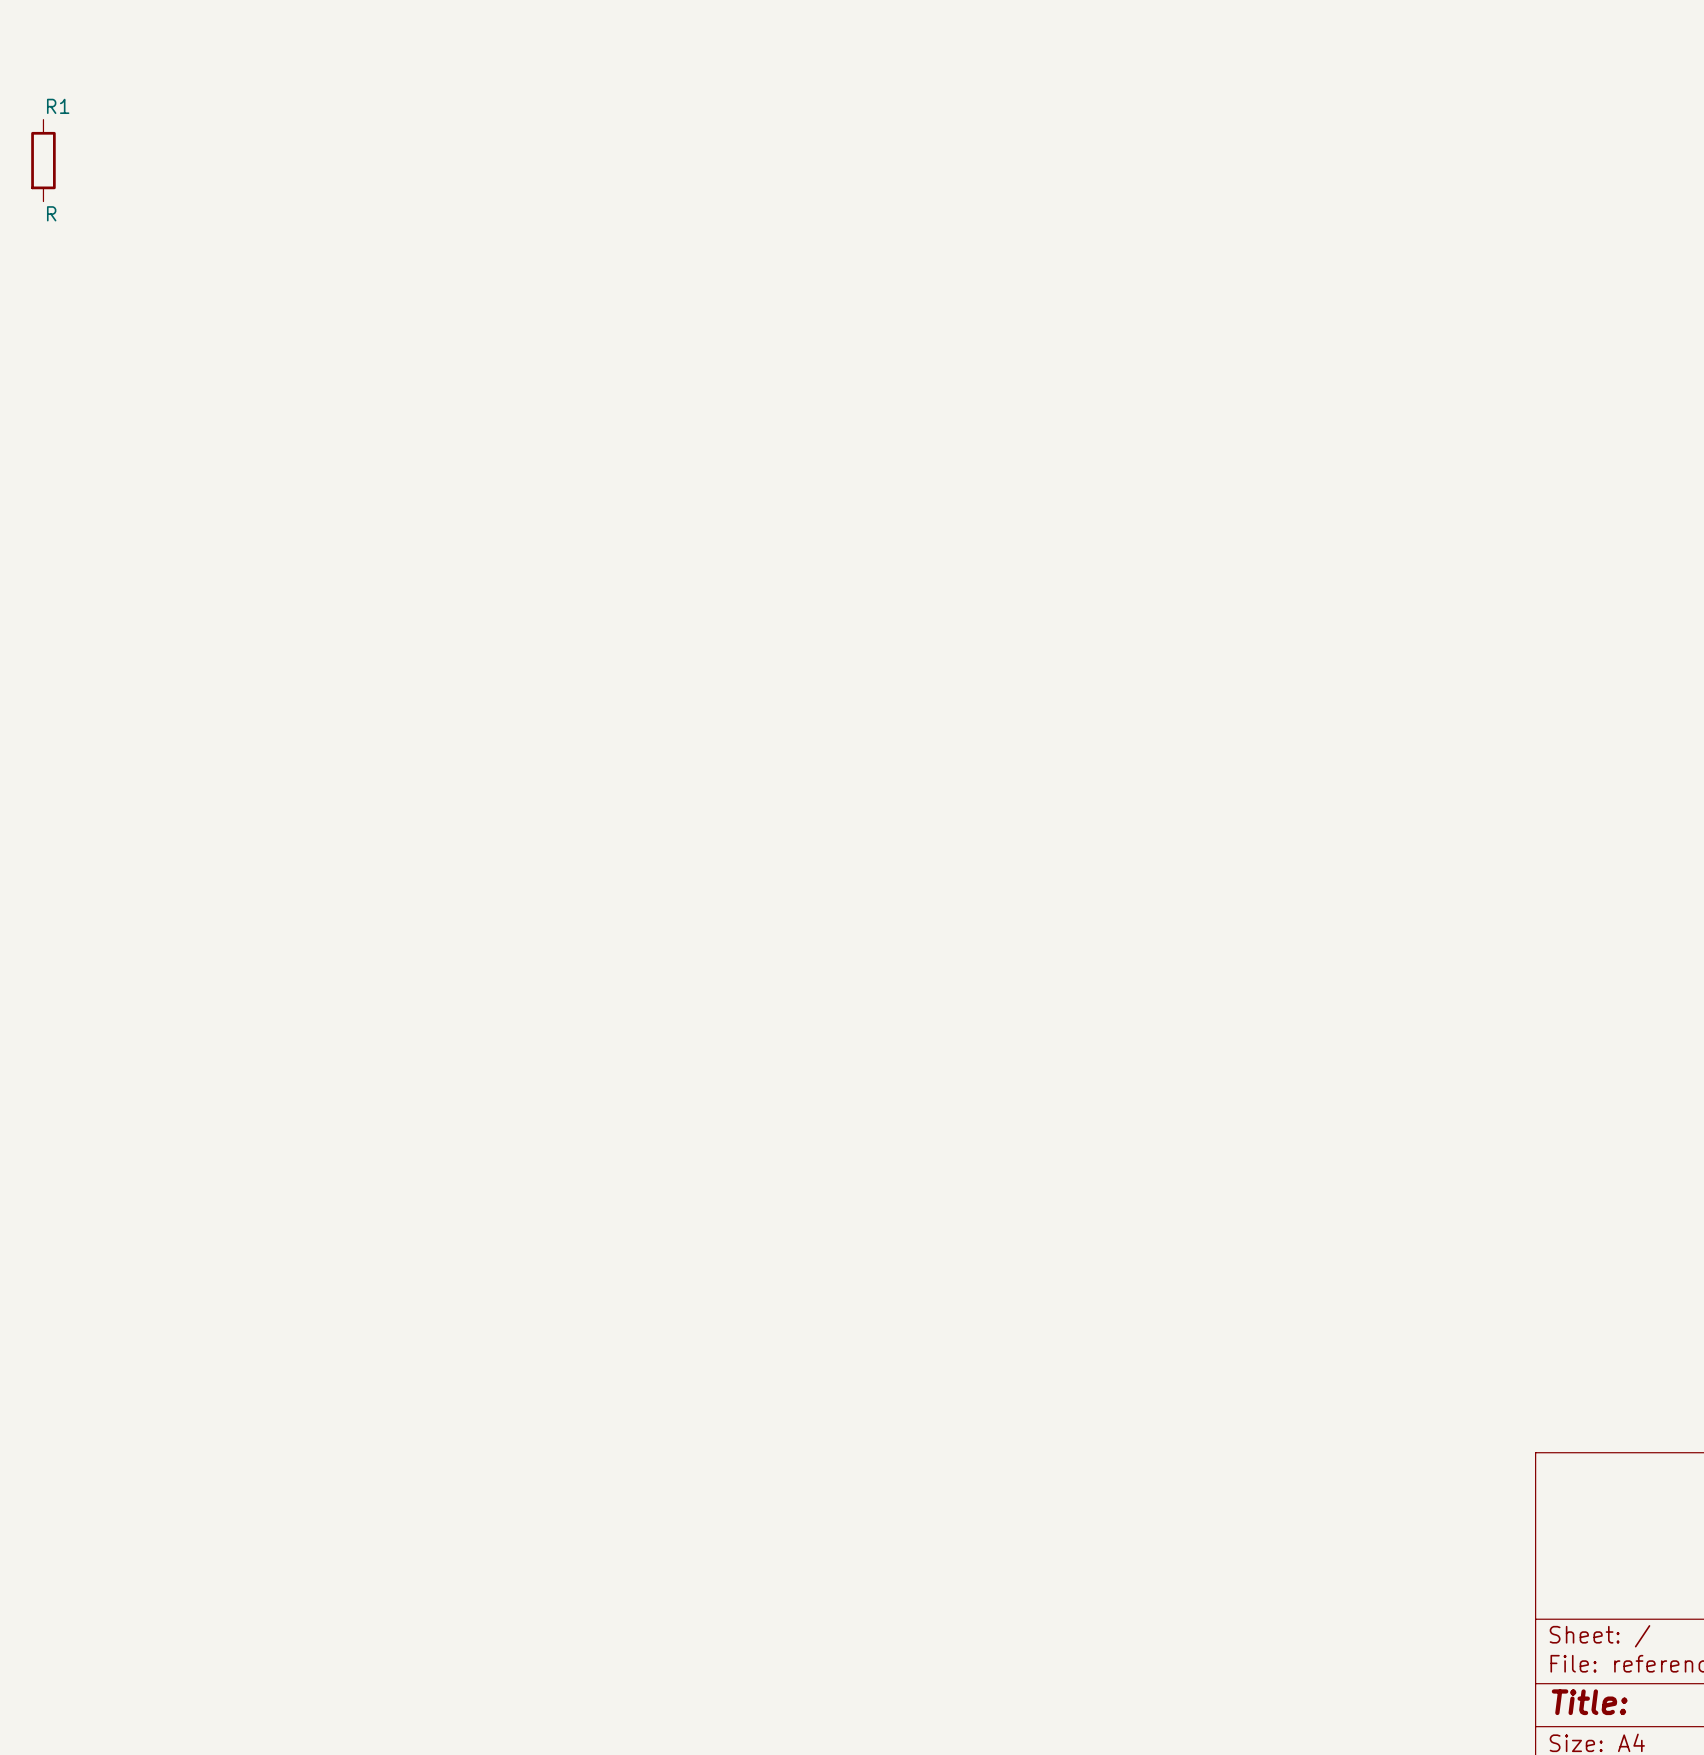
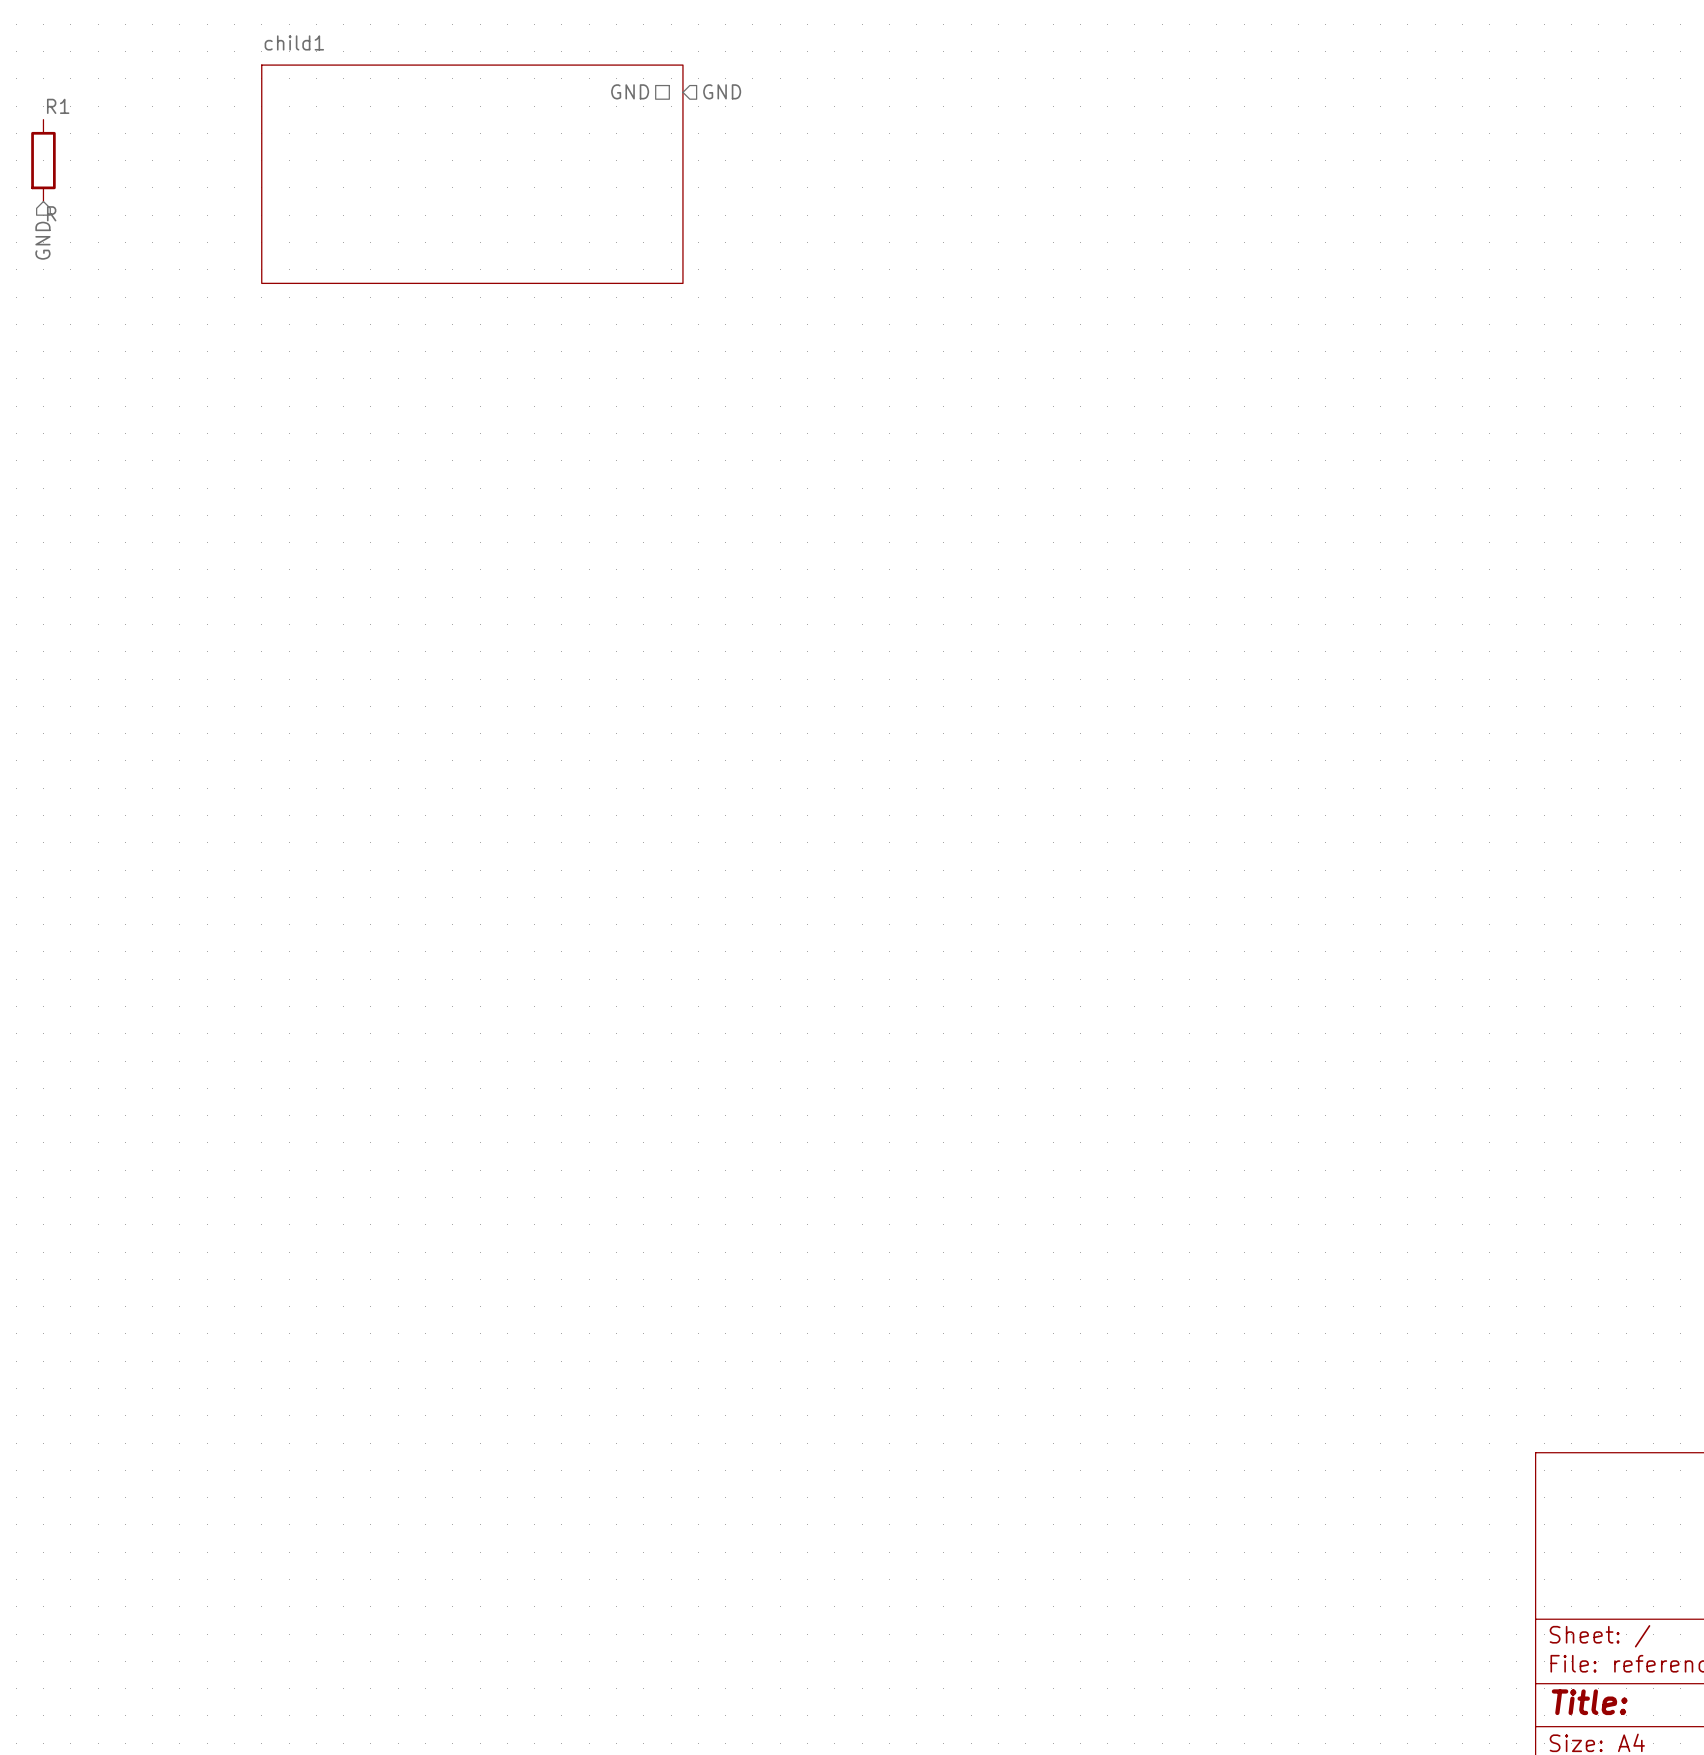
sheet pin: none -> GND (630, 91)
hierarchical label: none -> GND (722, 91)
sheet child1: none -> (472, 174)
hierarchical label: none -> GND (42, 240)

